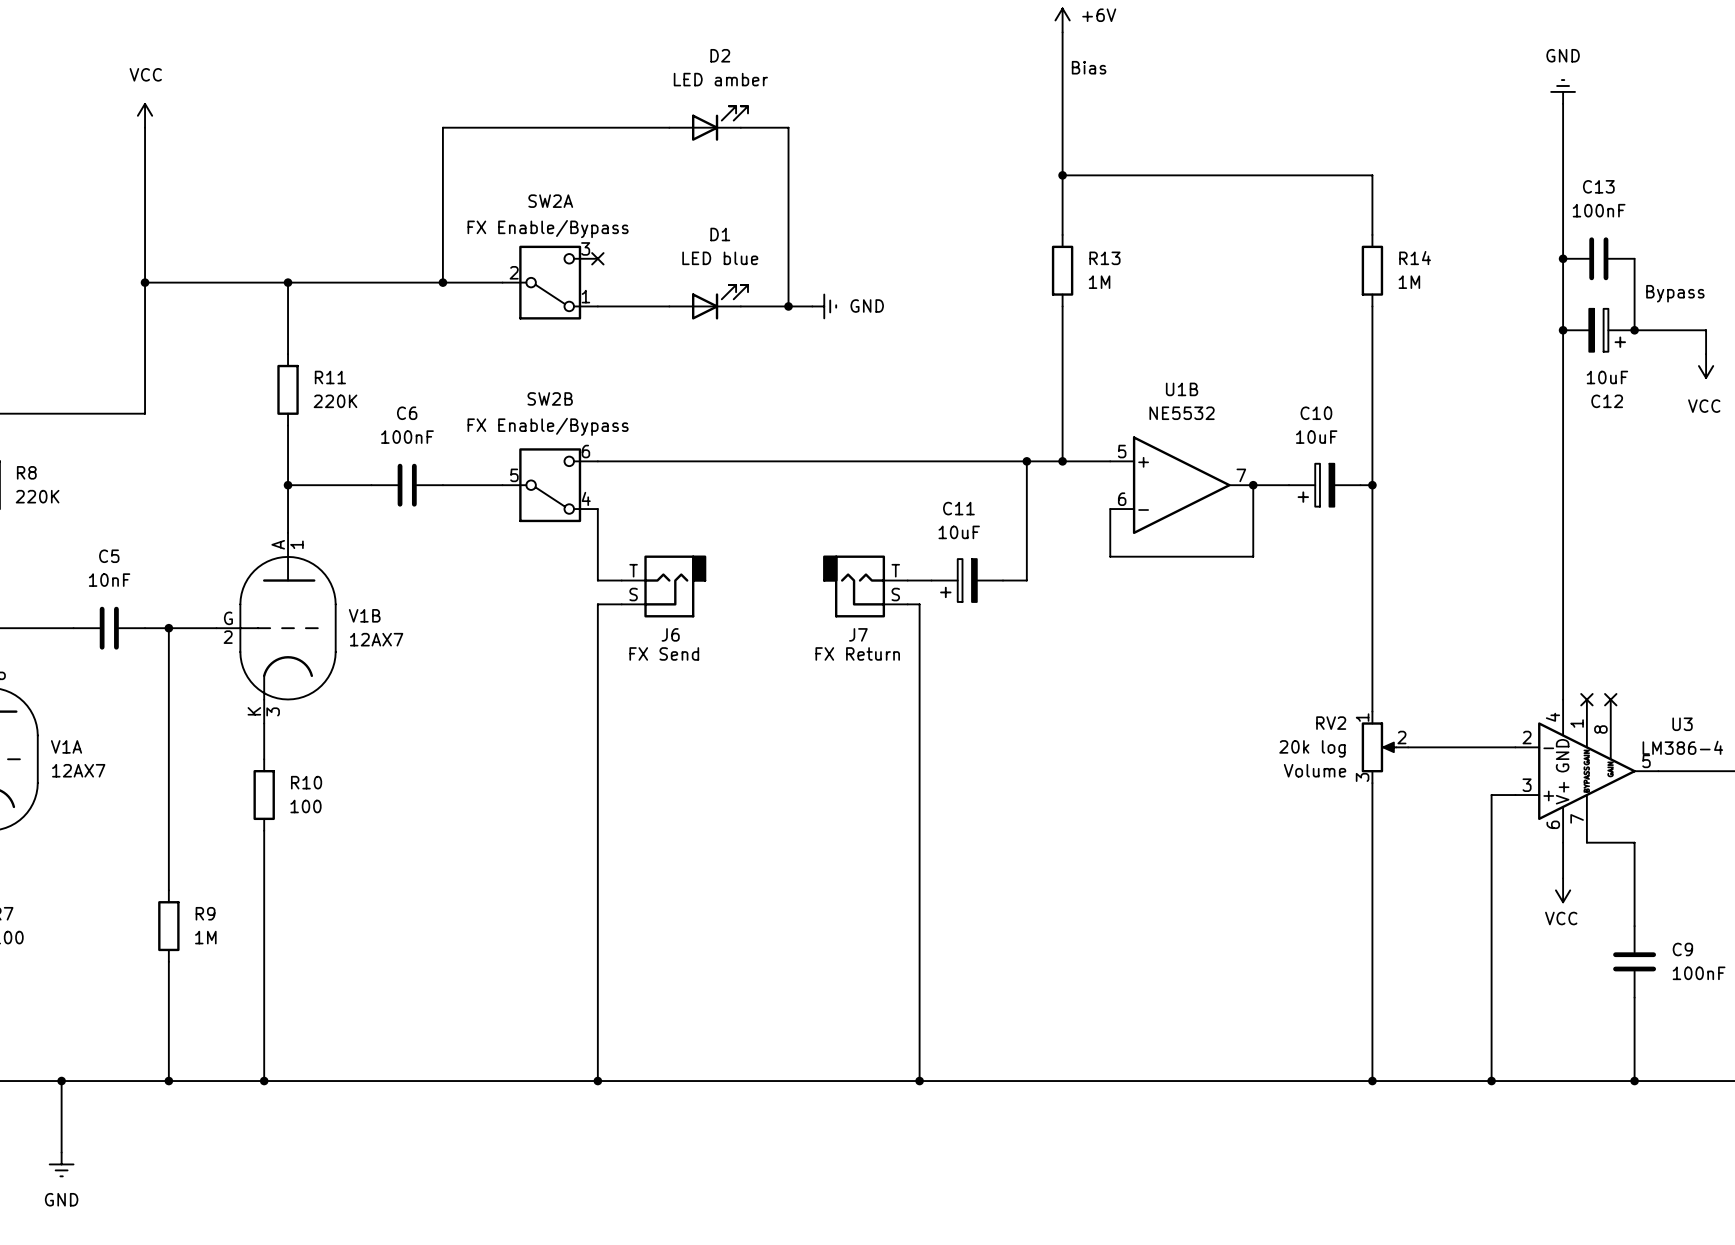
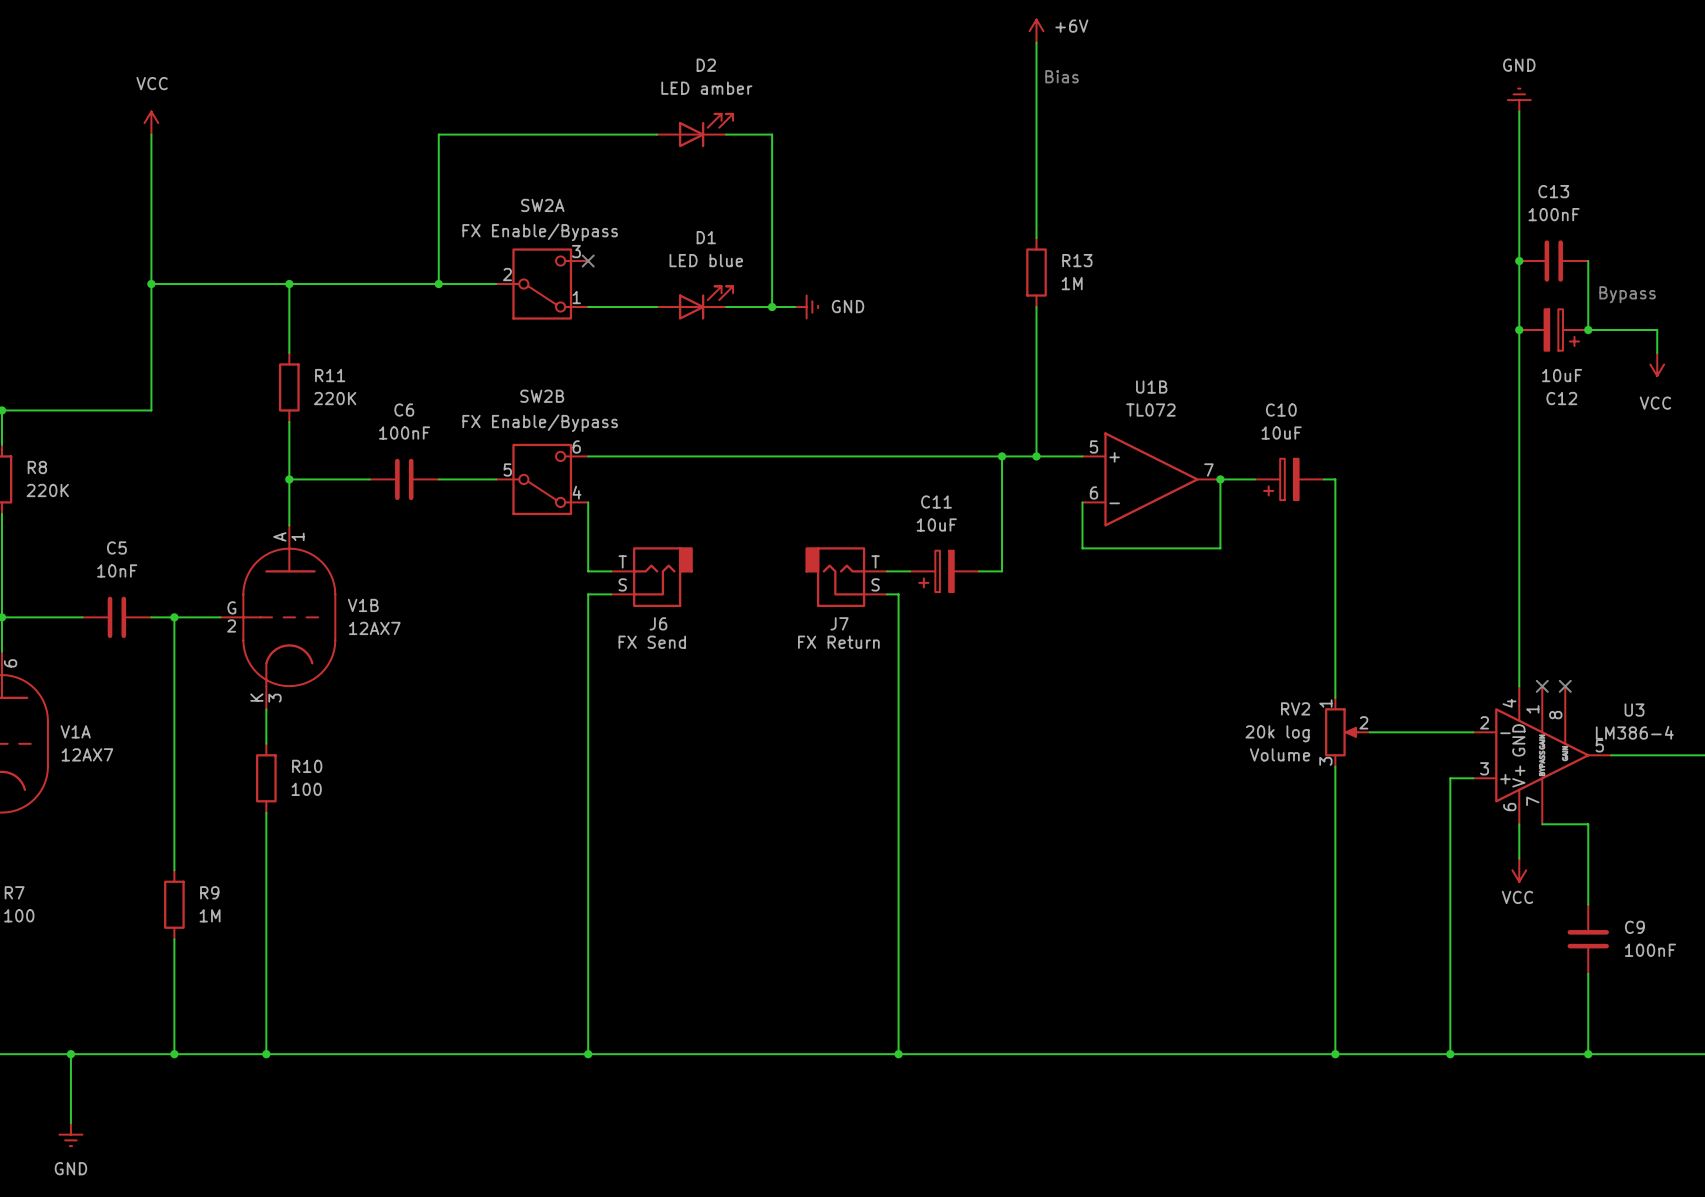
wire: (1062, 175) (1372, 175) (1372, 234) -> none
junction: (1062, 175) -> none
R14: 1M (1372, 270) -> none
wire: (1372, 306) (1372, 485) -> none
U1B value: NE5532 (1182, 413) -> TL072 (1150, 410)
junction: (1372, 485) -> none

